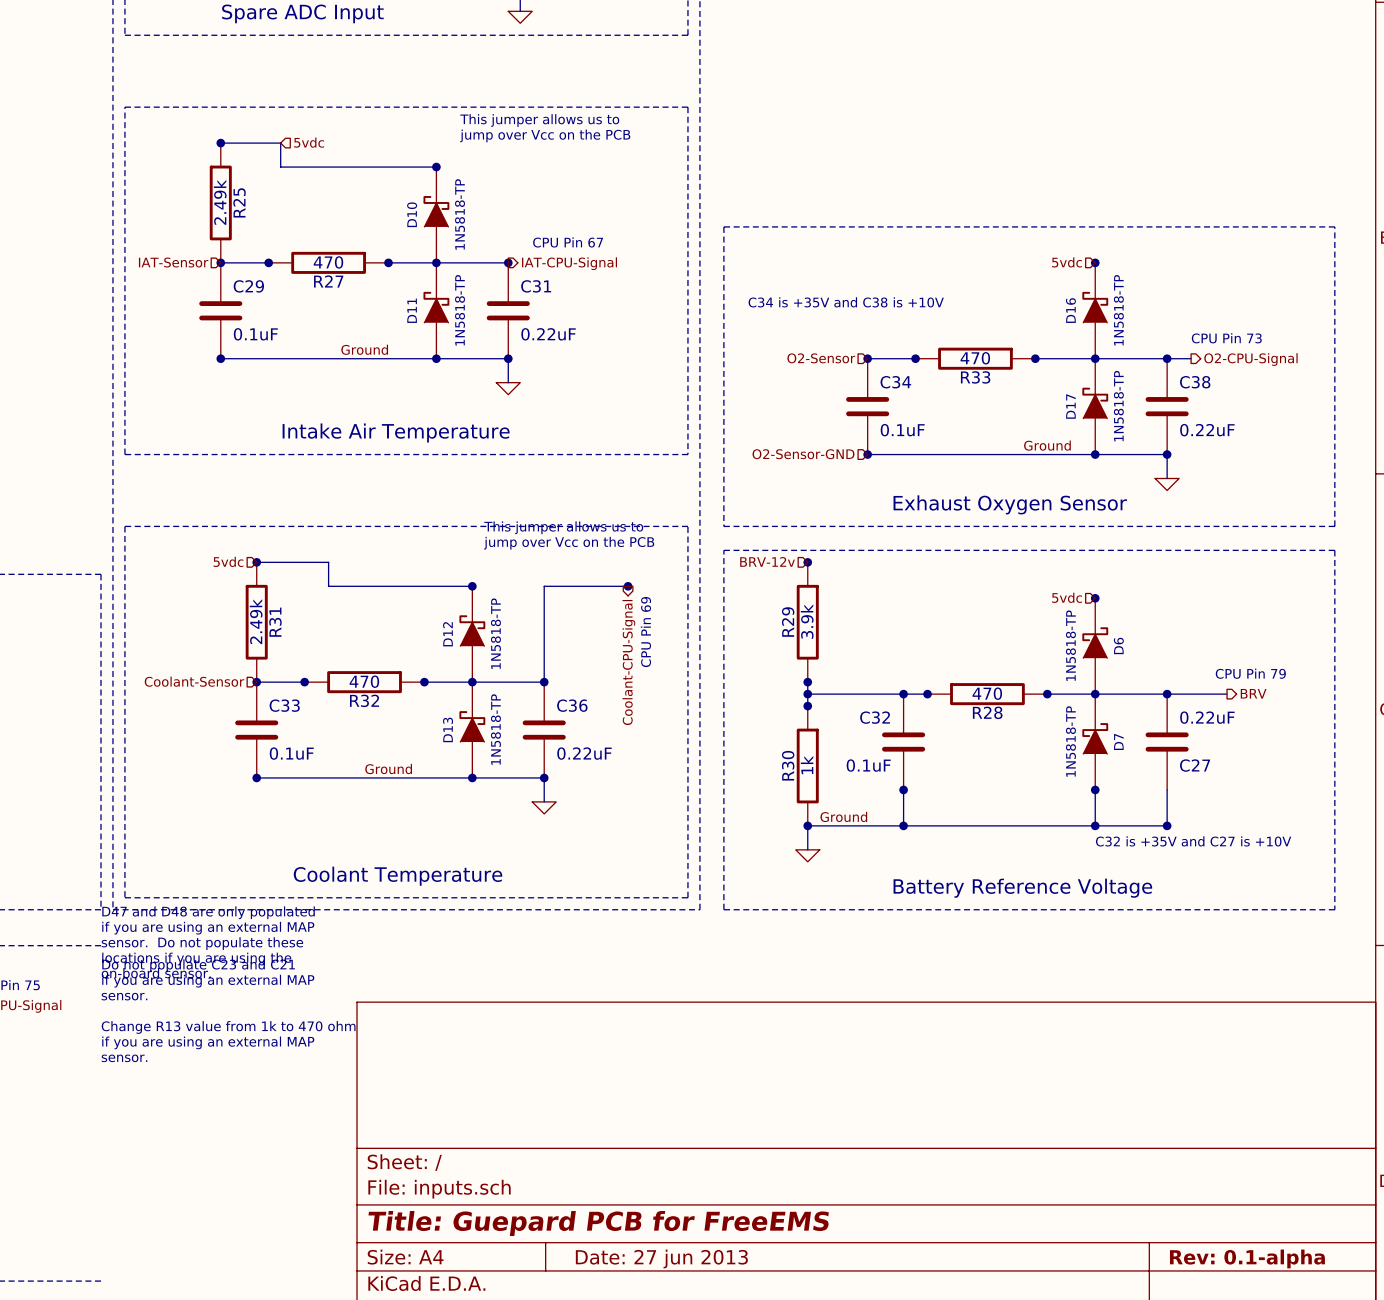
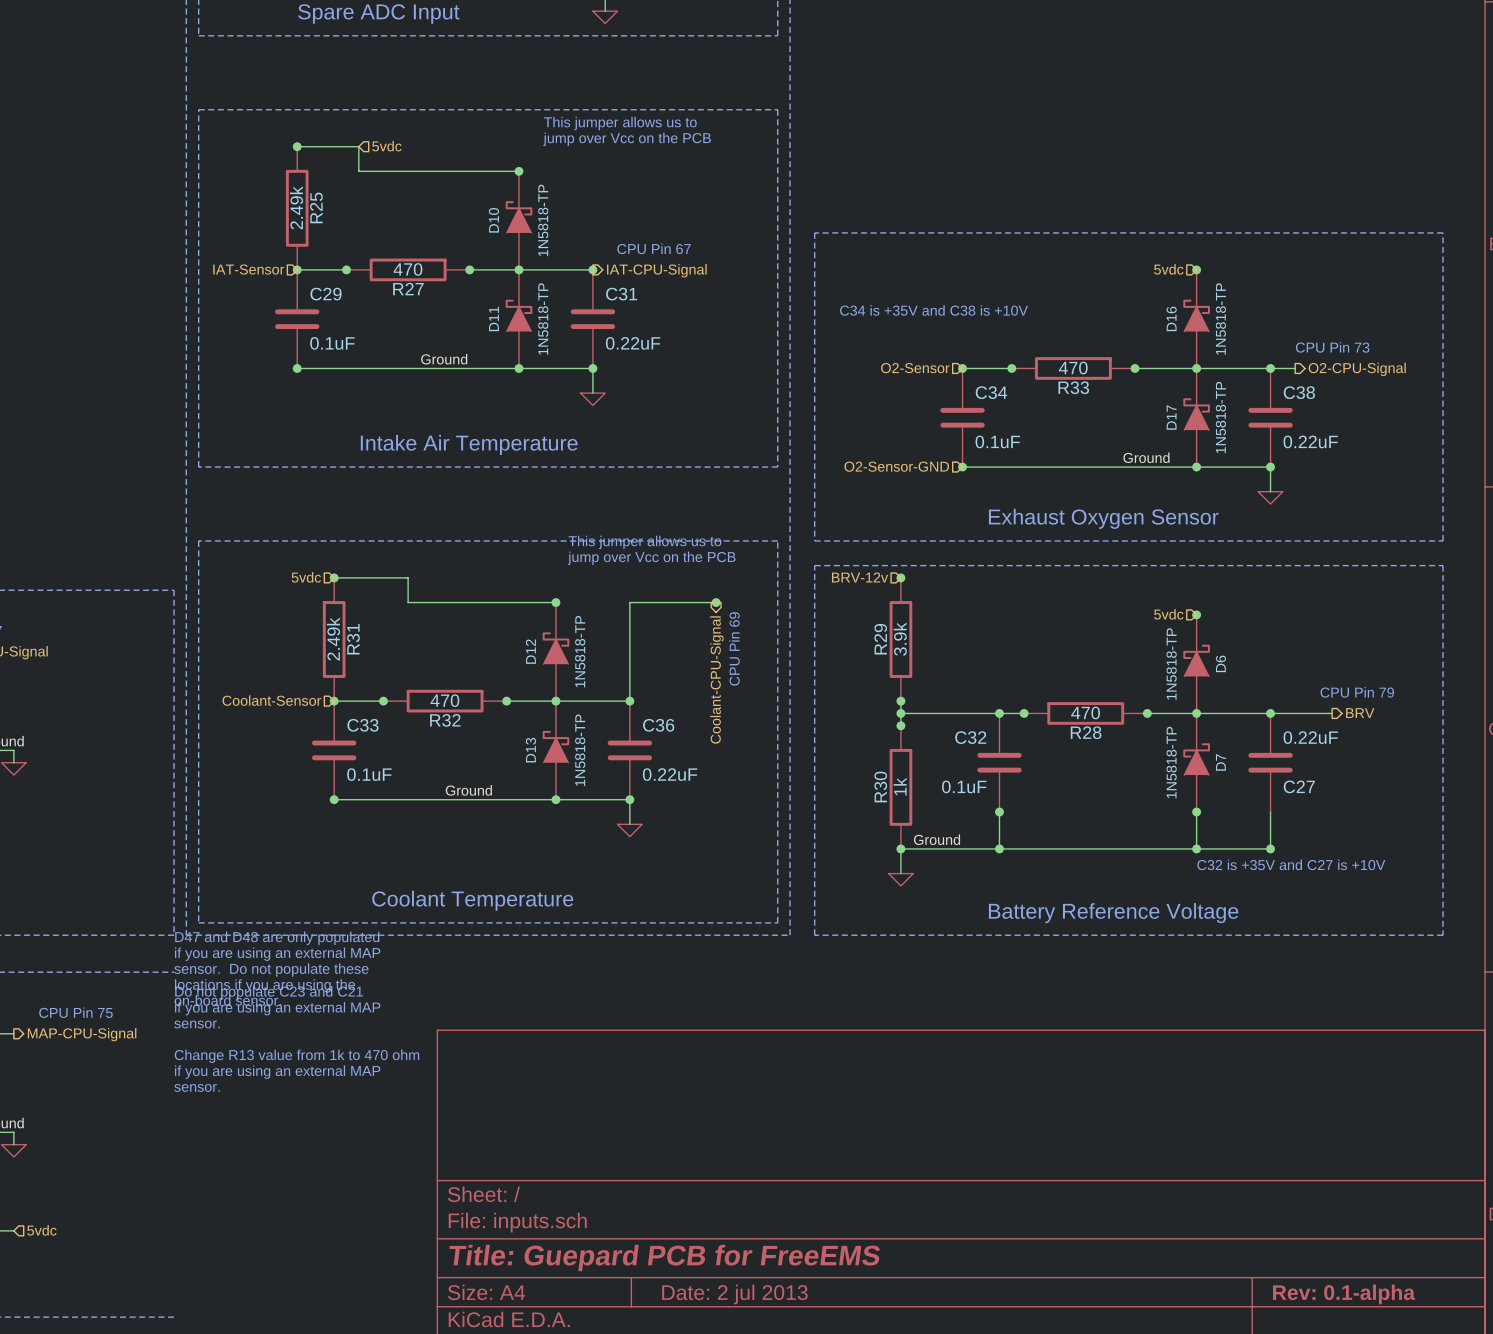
title block: Date: 27 jun 2013 (661, 1258) -> Date: 2 jul 2013 (734, 1294)

